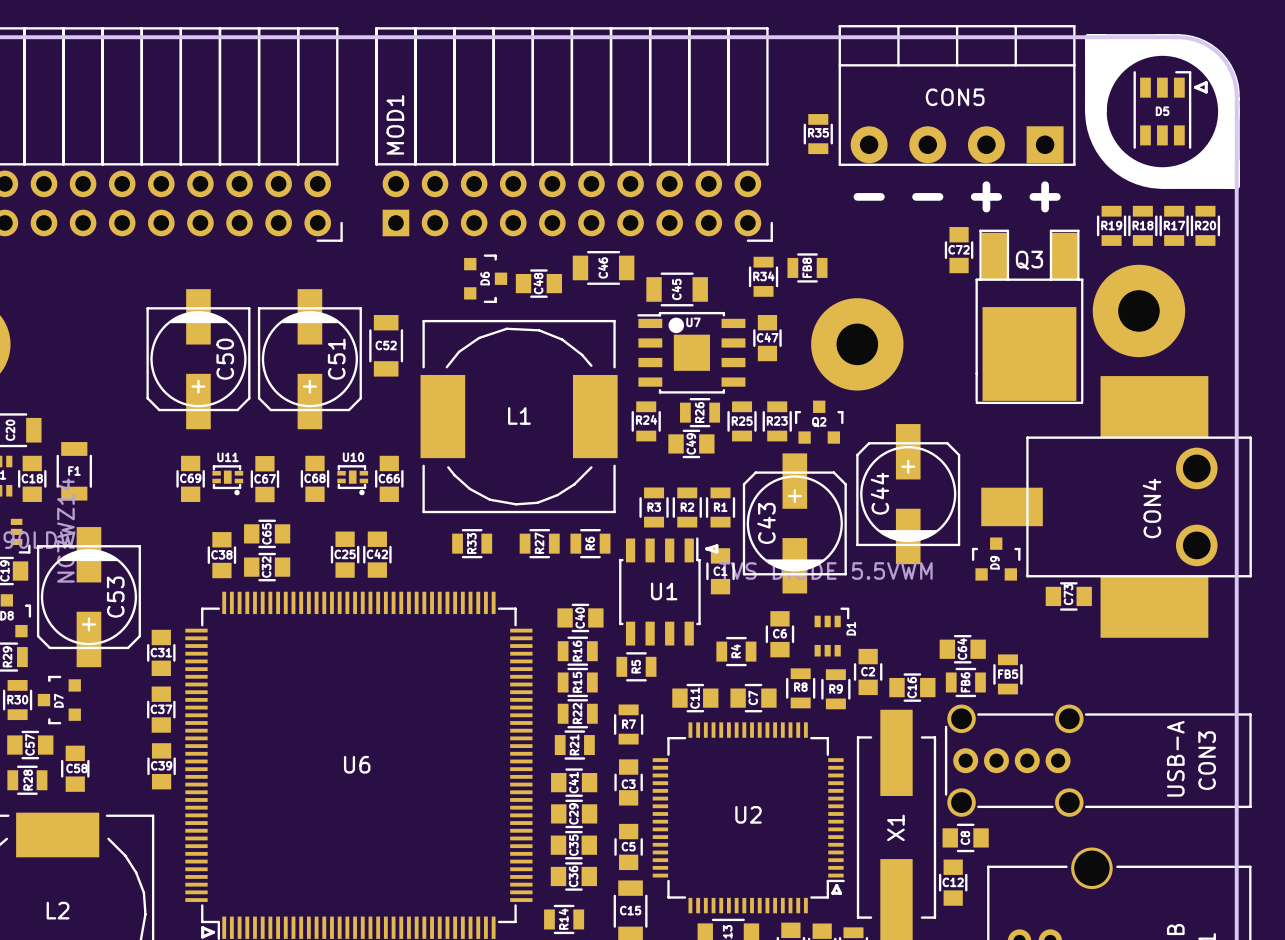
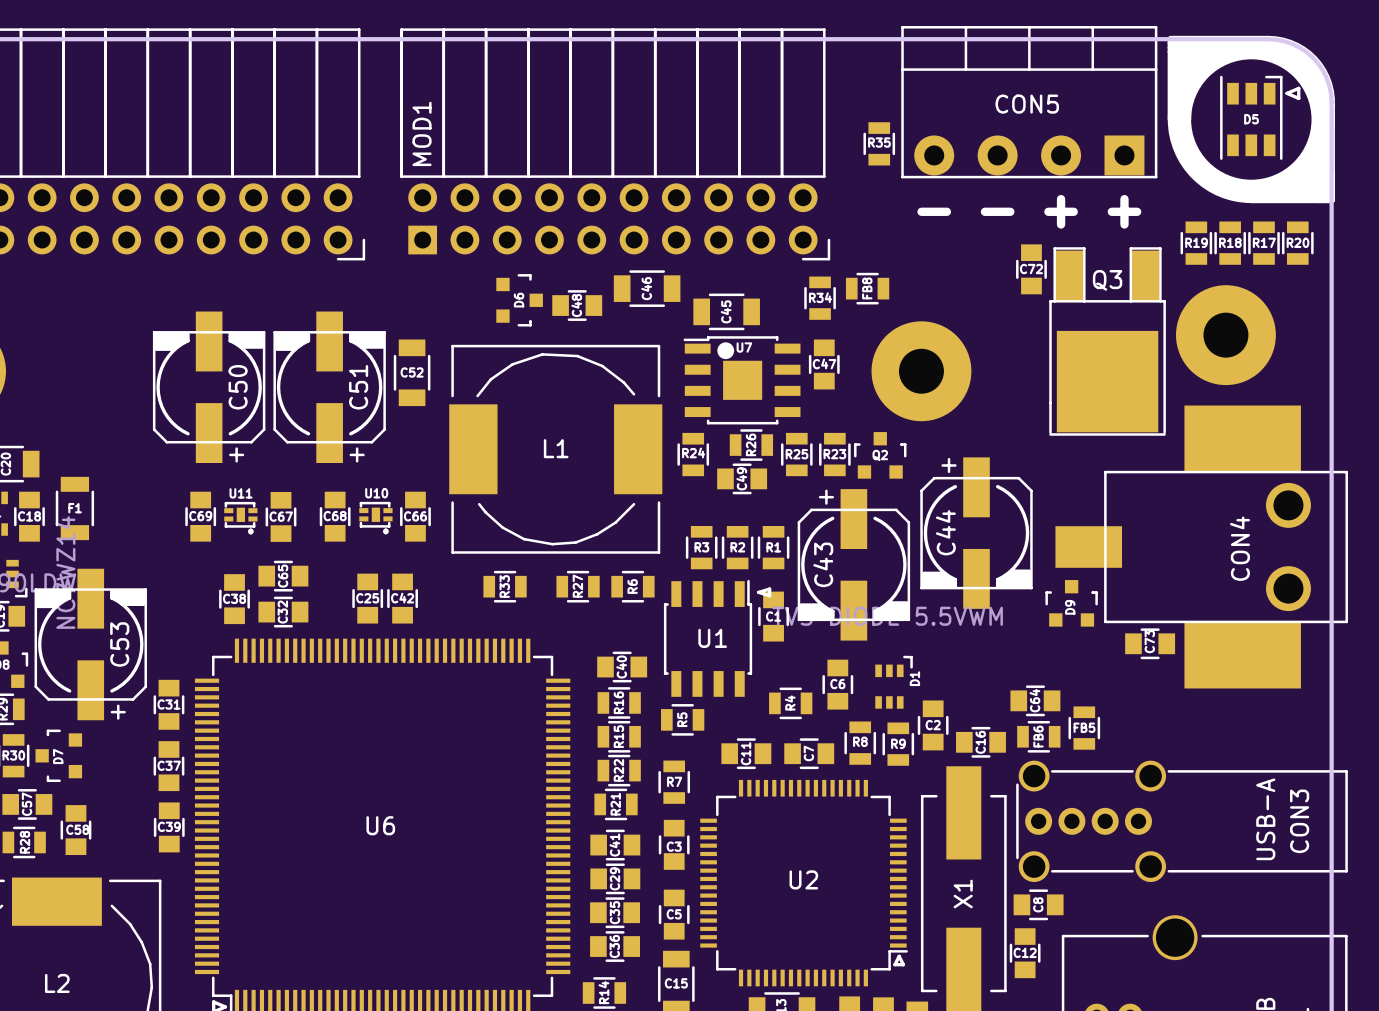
C50 footprint: [146, 289, 251, 430] -> [152, 311, 266, 464]
C51 footprint: [257, 289, 362, 430] -> [273, 311, 386, 464]
C44 footprint: [856, 424, 961, 565] -> [920, 457, 1033, 609]
C43 footprint: [742, 453, 847, 594] -> [797, 489, 911, 641]
C53 footprint: [36, 527, 141, 668] -> [34, 568, 147, 721]

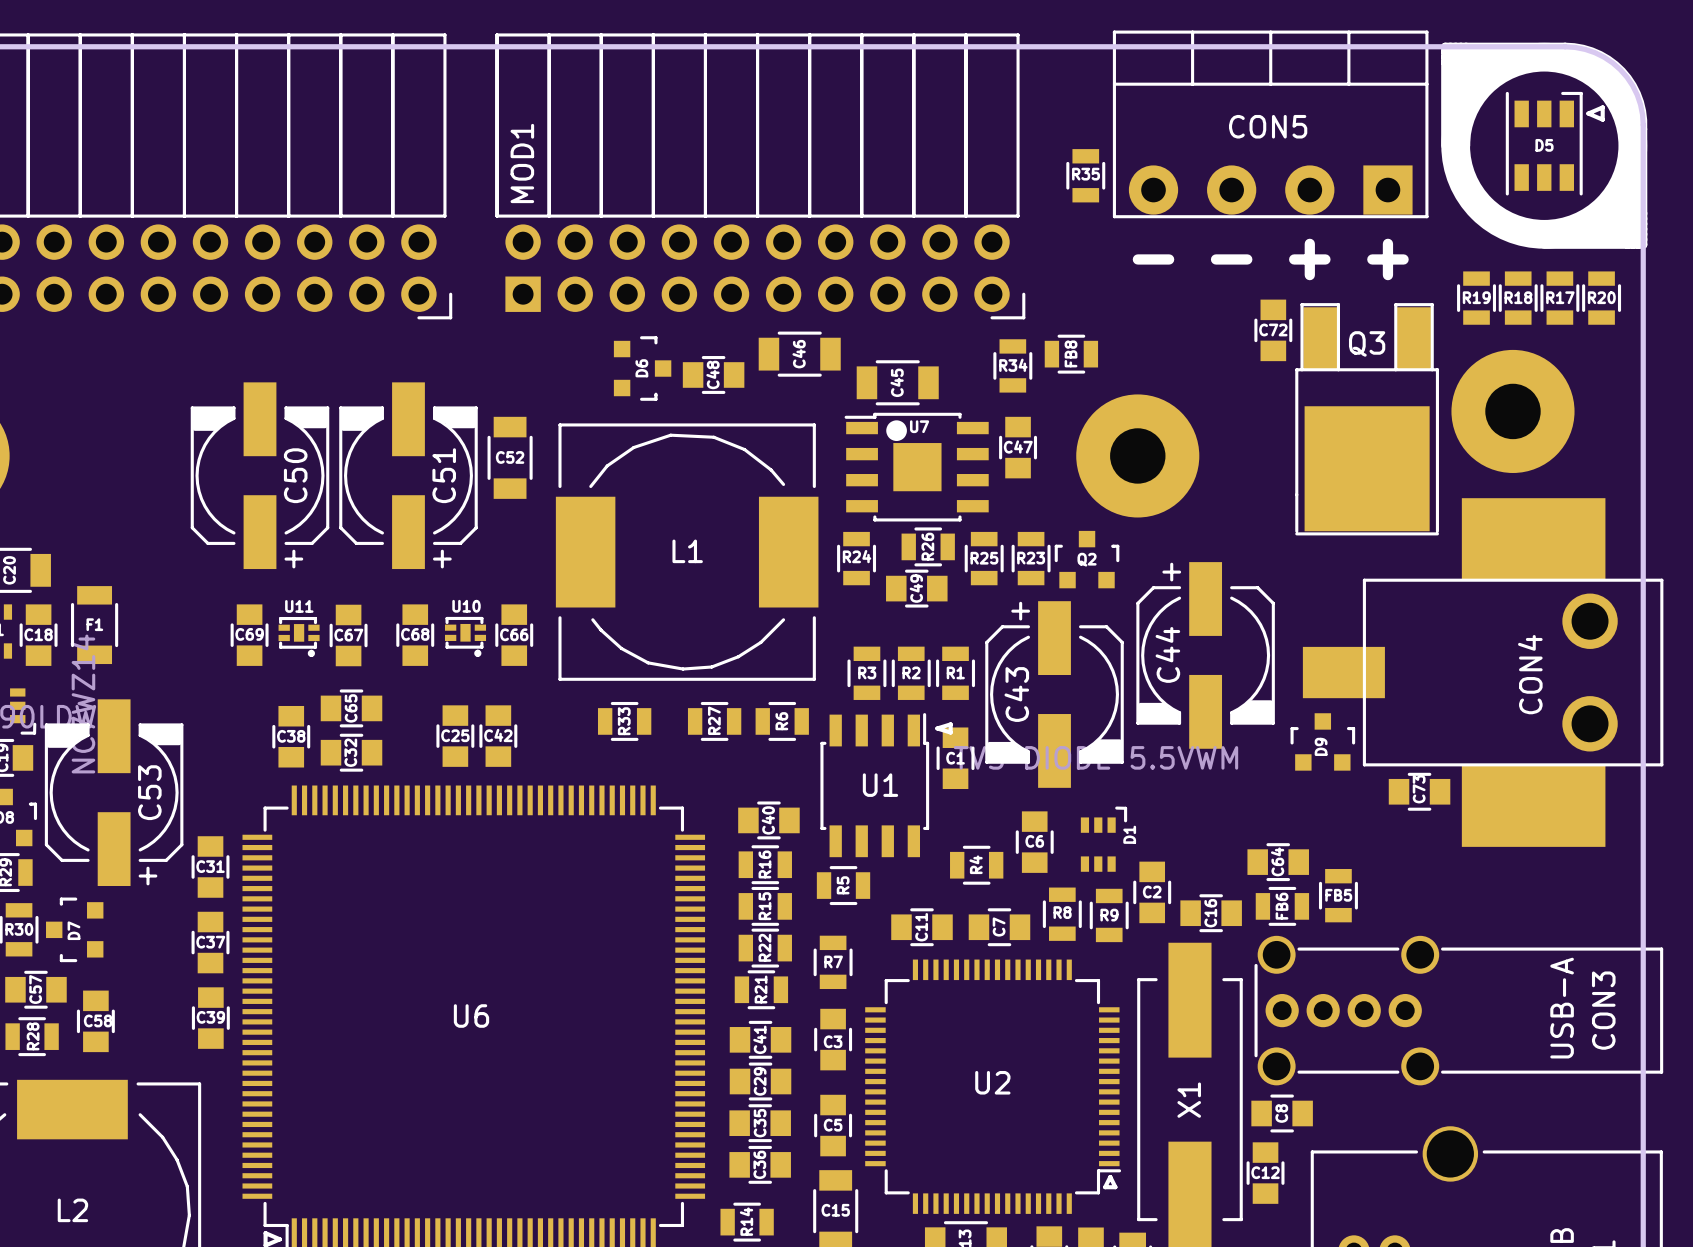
C50 footprint: [152, 311, 266, 464] -> [190, 382, 330, 570]
C51 footprint: [273, 311, 386, 464] -> [339, 382, 478, 570]
C44 footprint: [920, 457, 1033, 609] -> [1136, 562, 1275, 749]
C43 footprint: [797, 489, 911, 641] -> [985, 601, 1124, 788]
C53 footprint: [34, 568, 147, 721] -> [44, 699, 184, 887]

